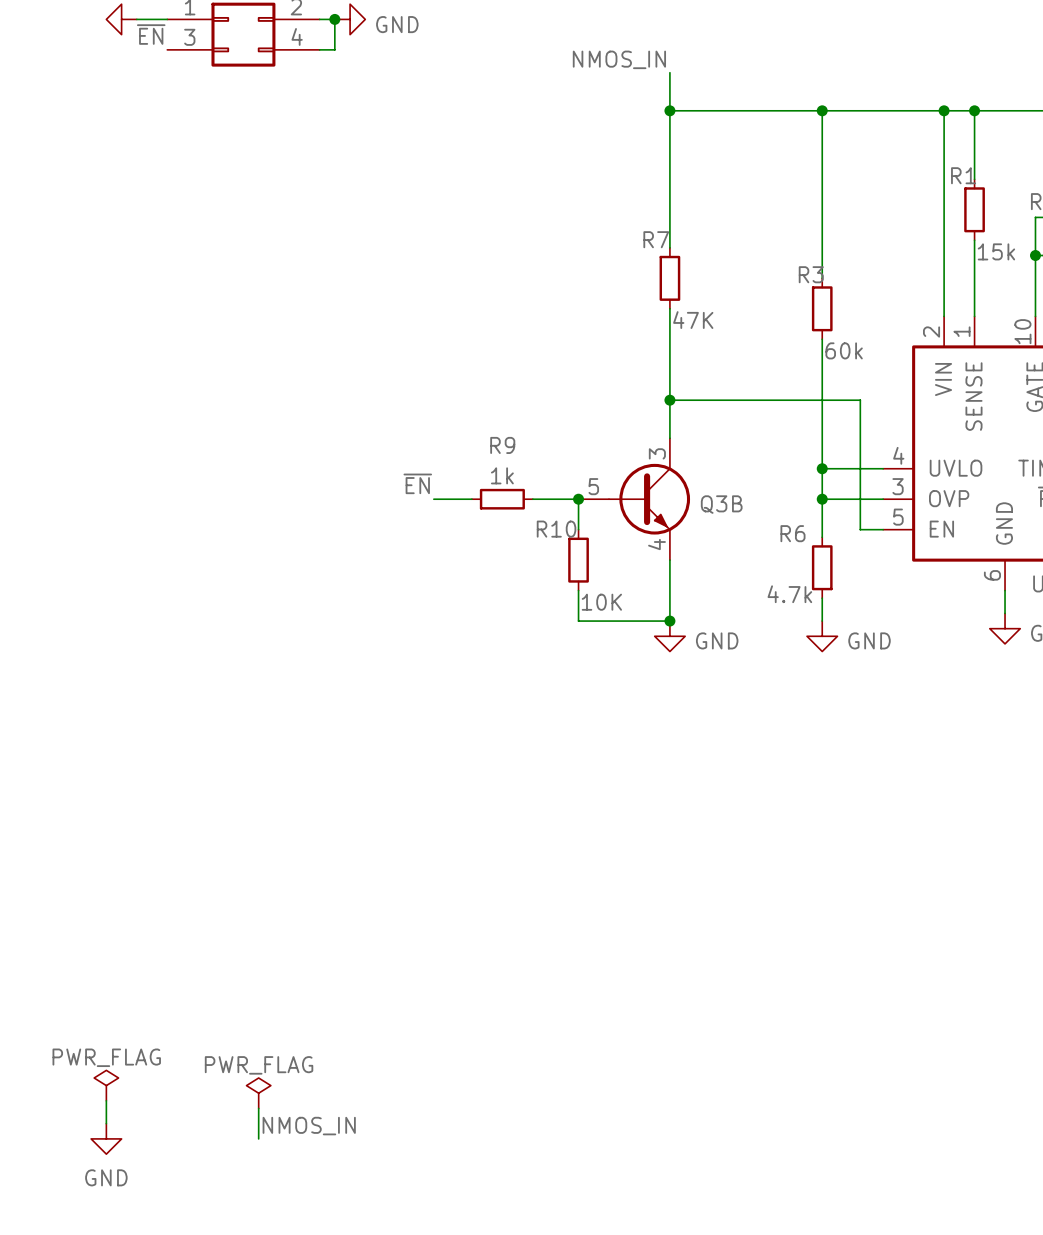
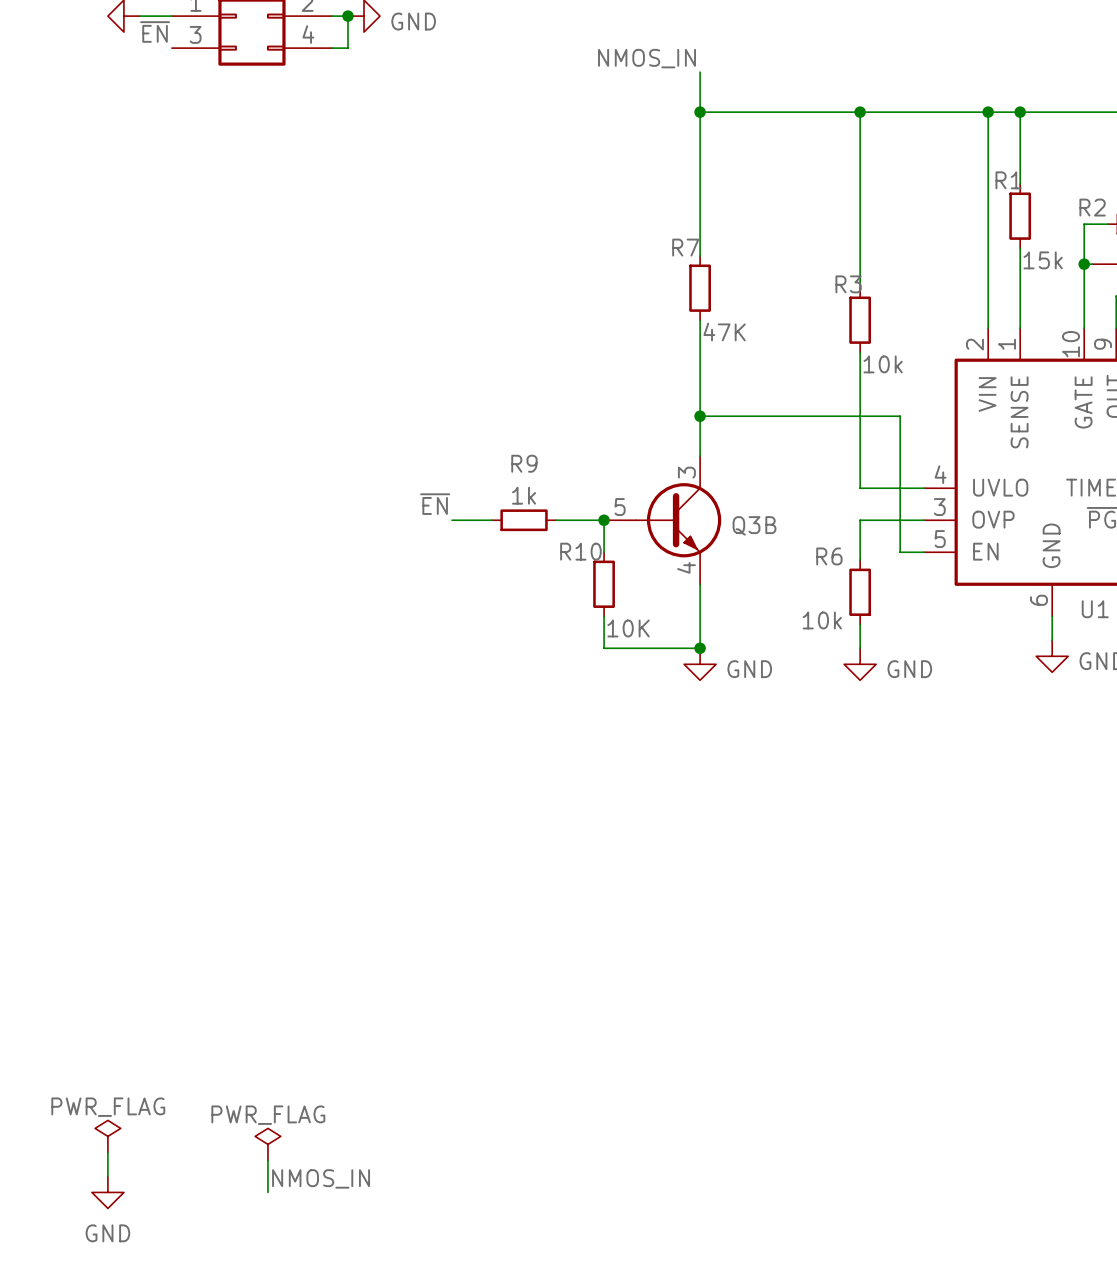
R3 value: 60k (844, 350) -> 10k (883, 364)
wire: (822, 468) (822, 499) -> none
junction: (822, 468) -> none
junction: (822, 499) -> none
R6 value: 4.7k (789, 594) -> 10k (822, 620)

